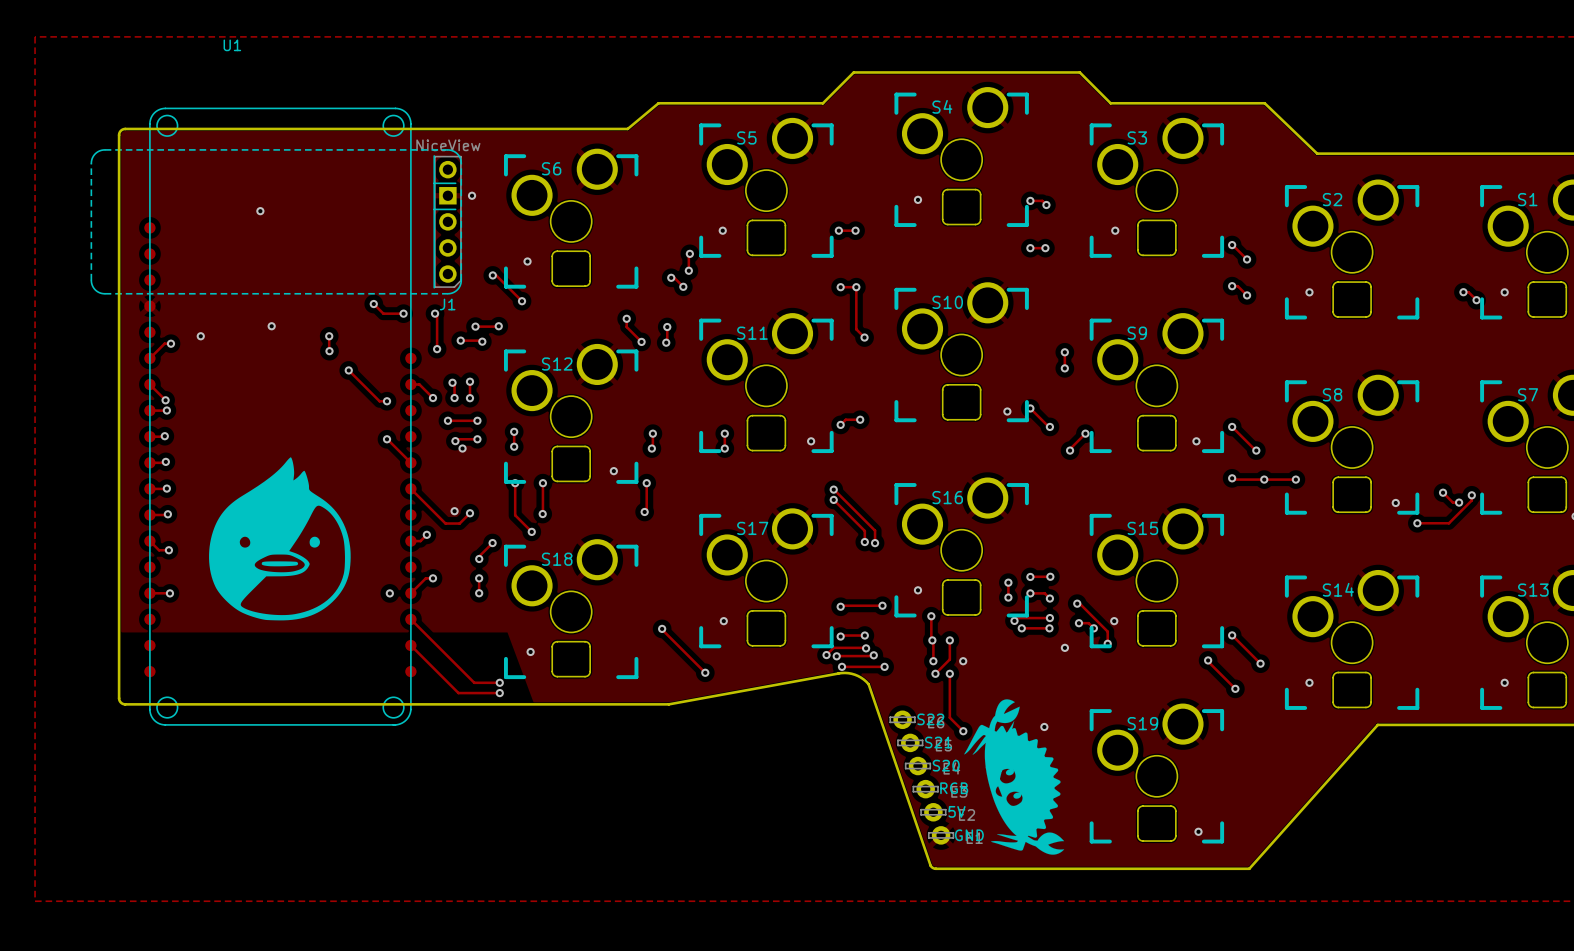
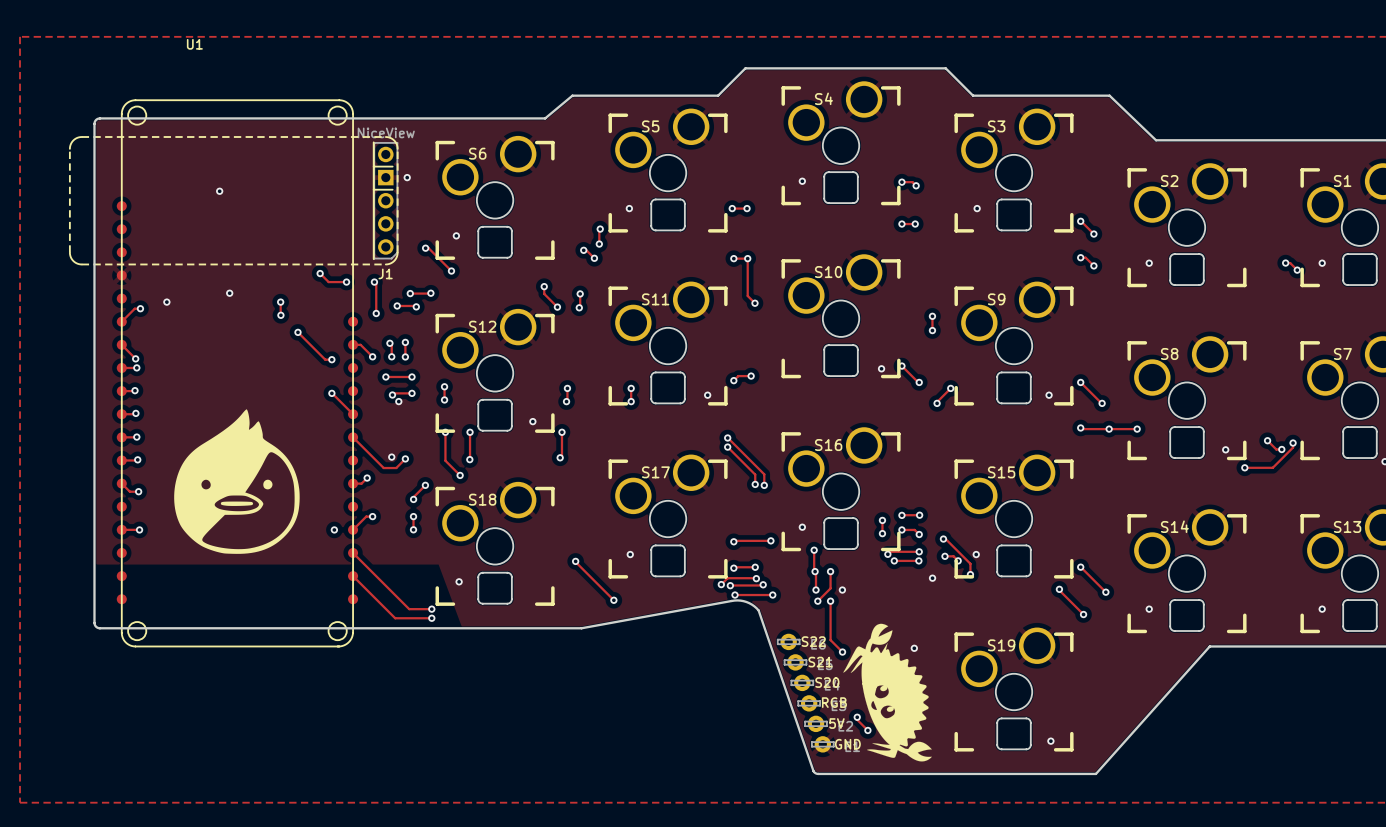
track: none -> (857, 717) (857, 719) (867, 730)
via: none -> (857, 717)
via: none -> (867, 730)

